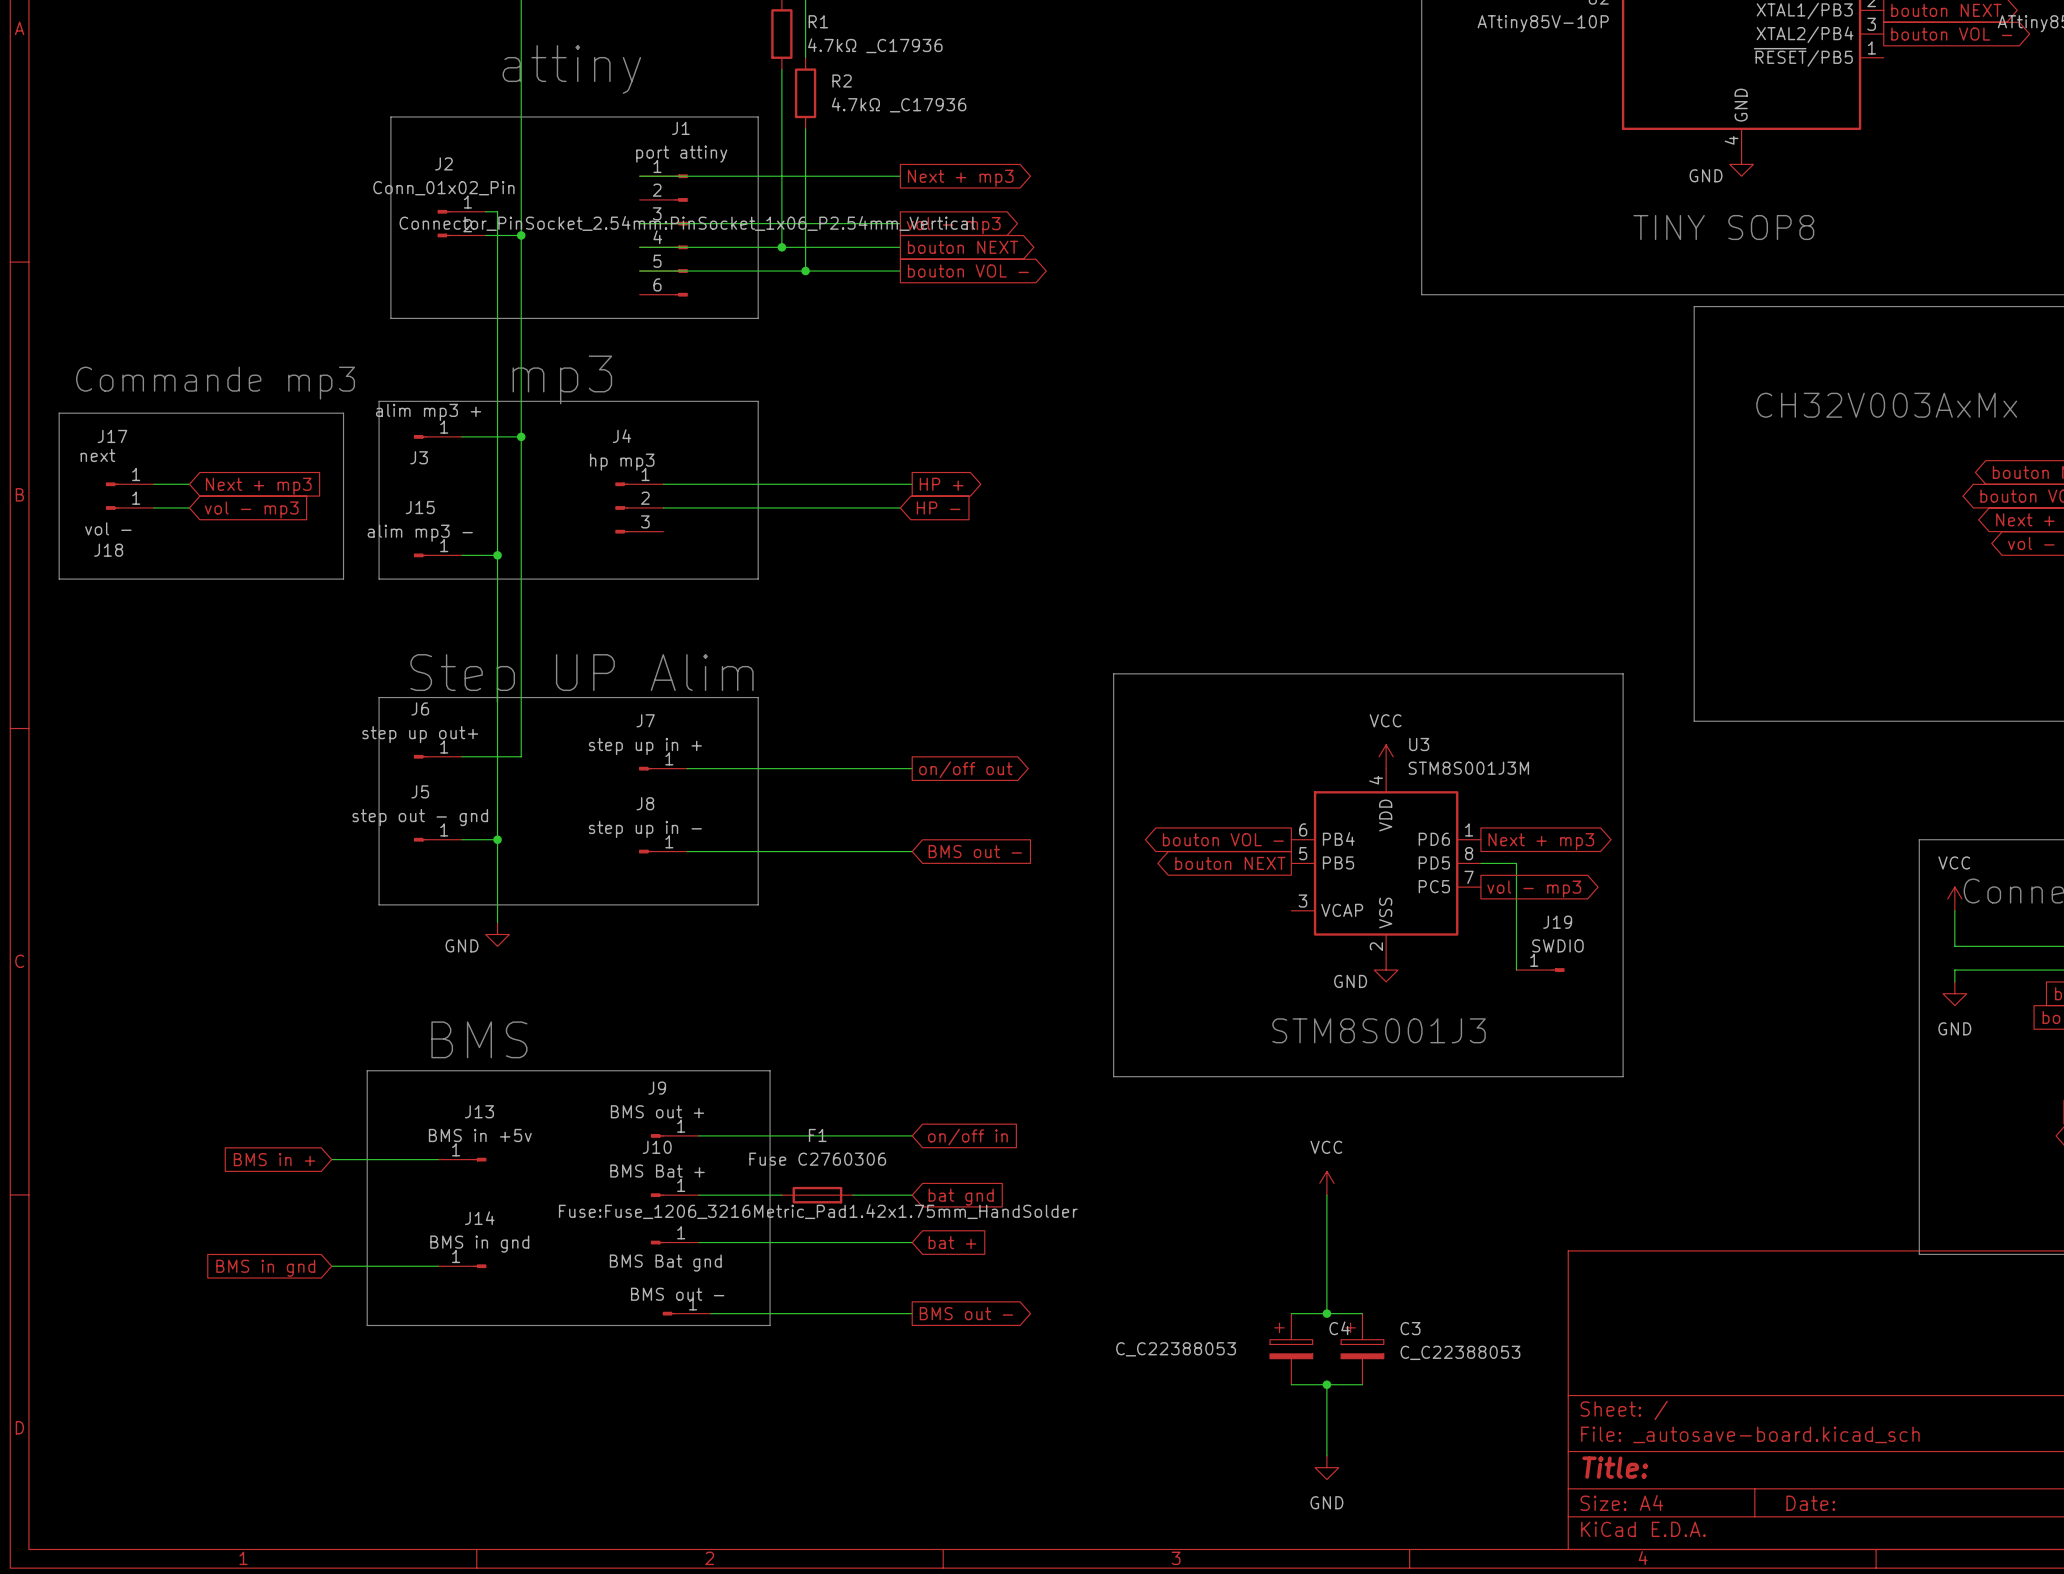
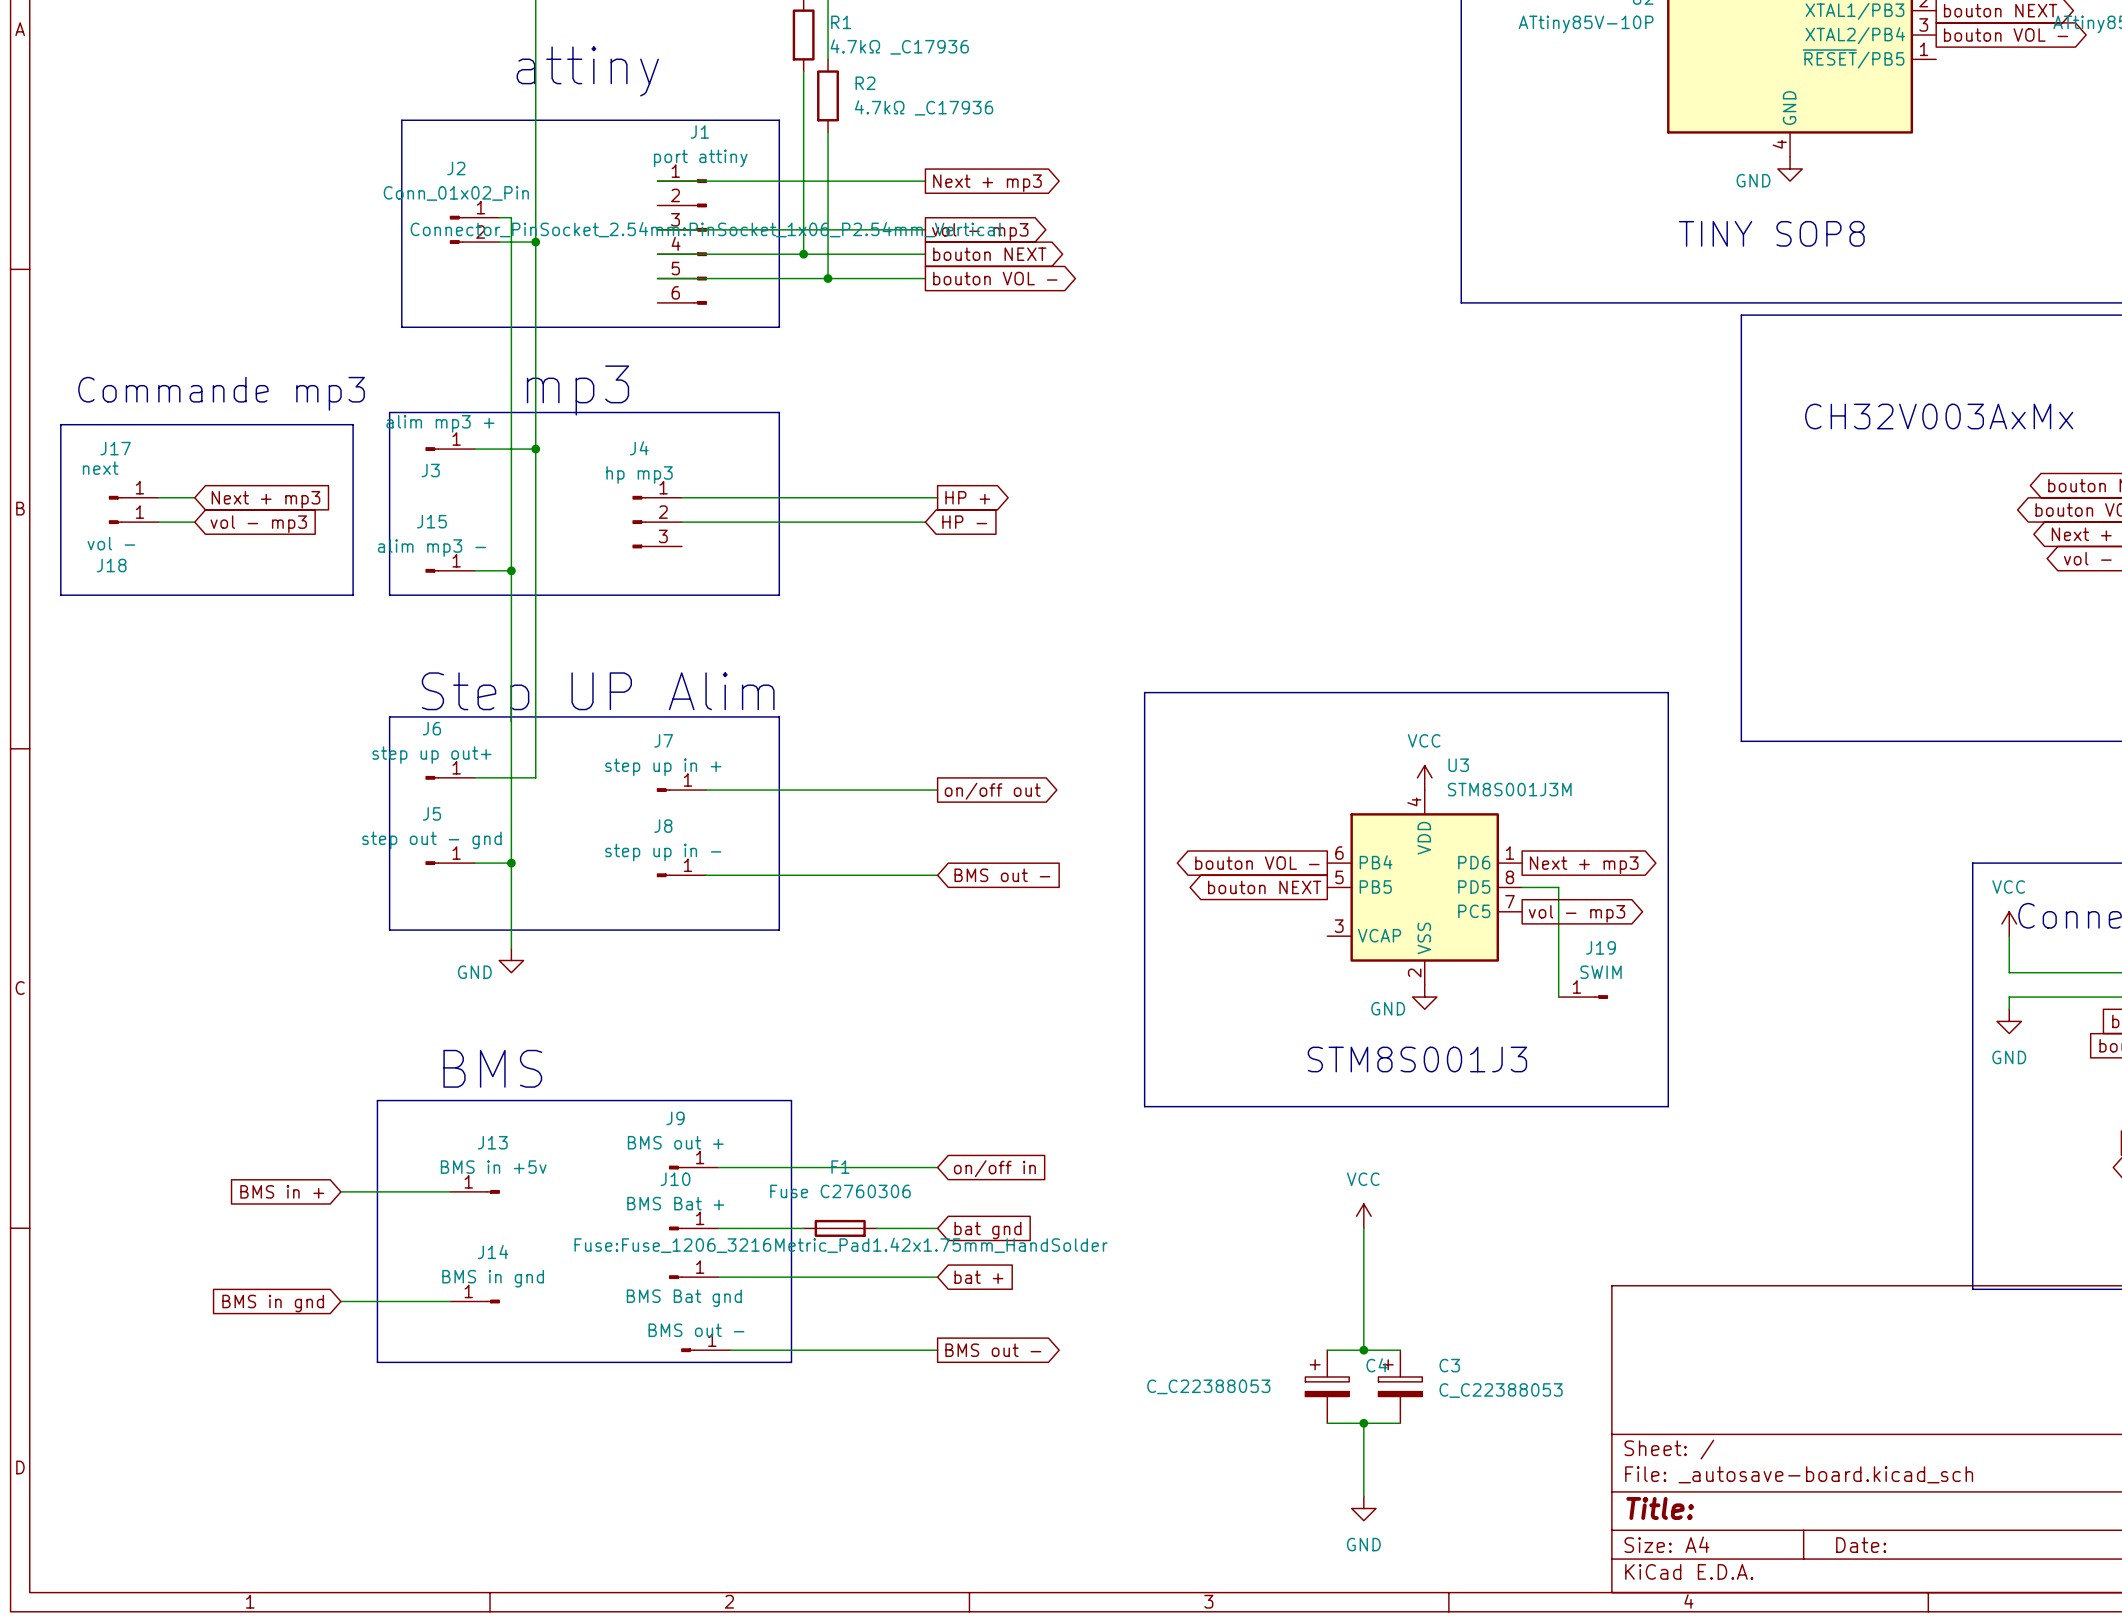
J19 value: SWDIO (1557, 945) -> SWIM (1601, 972)

